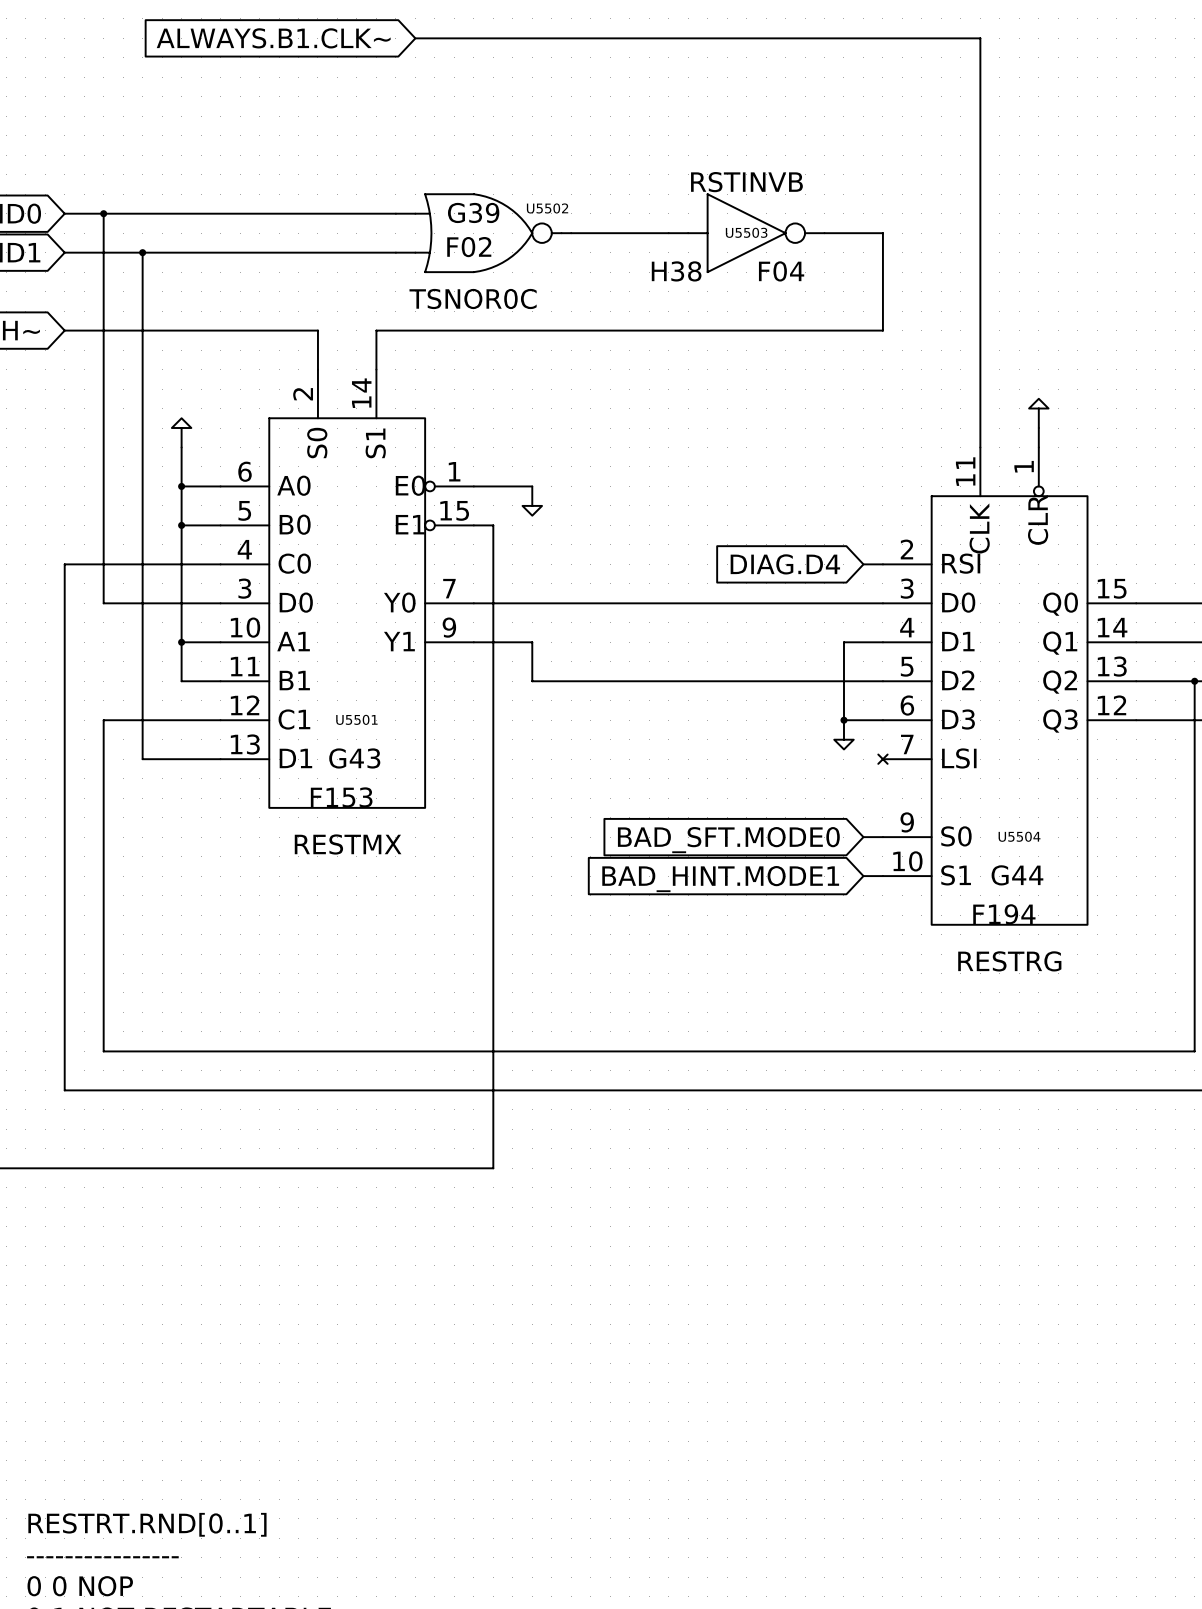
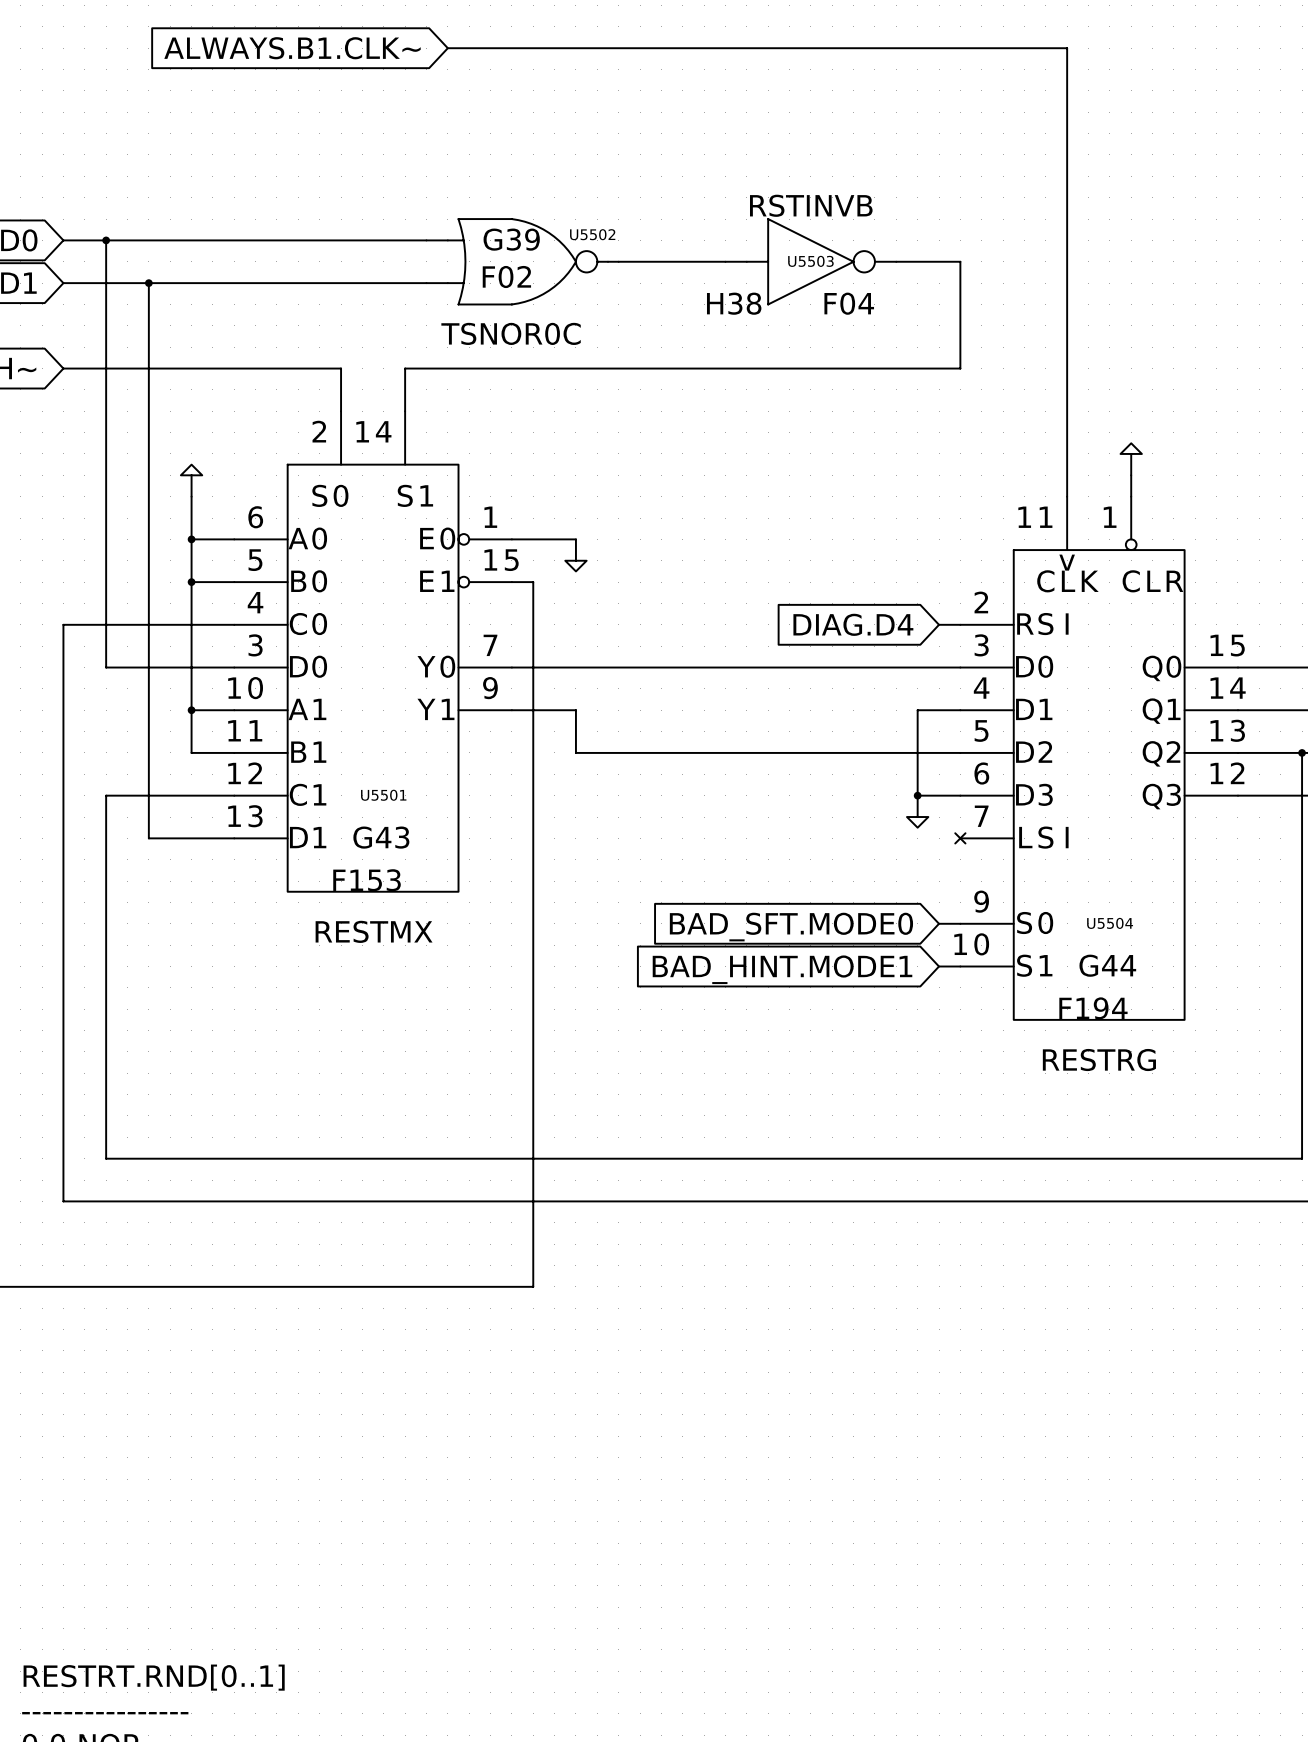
U5501 symbol: [220, 369, 474, 808] -> [234, 411, 512, 892]
U5504 symbol: [882, 447, 1137, 925] -> [960, 496, 1238, 1020]

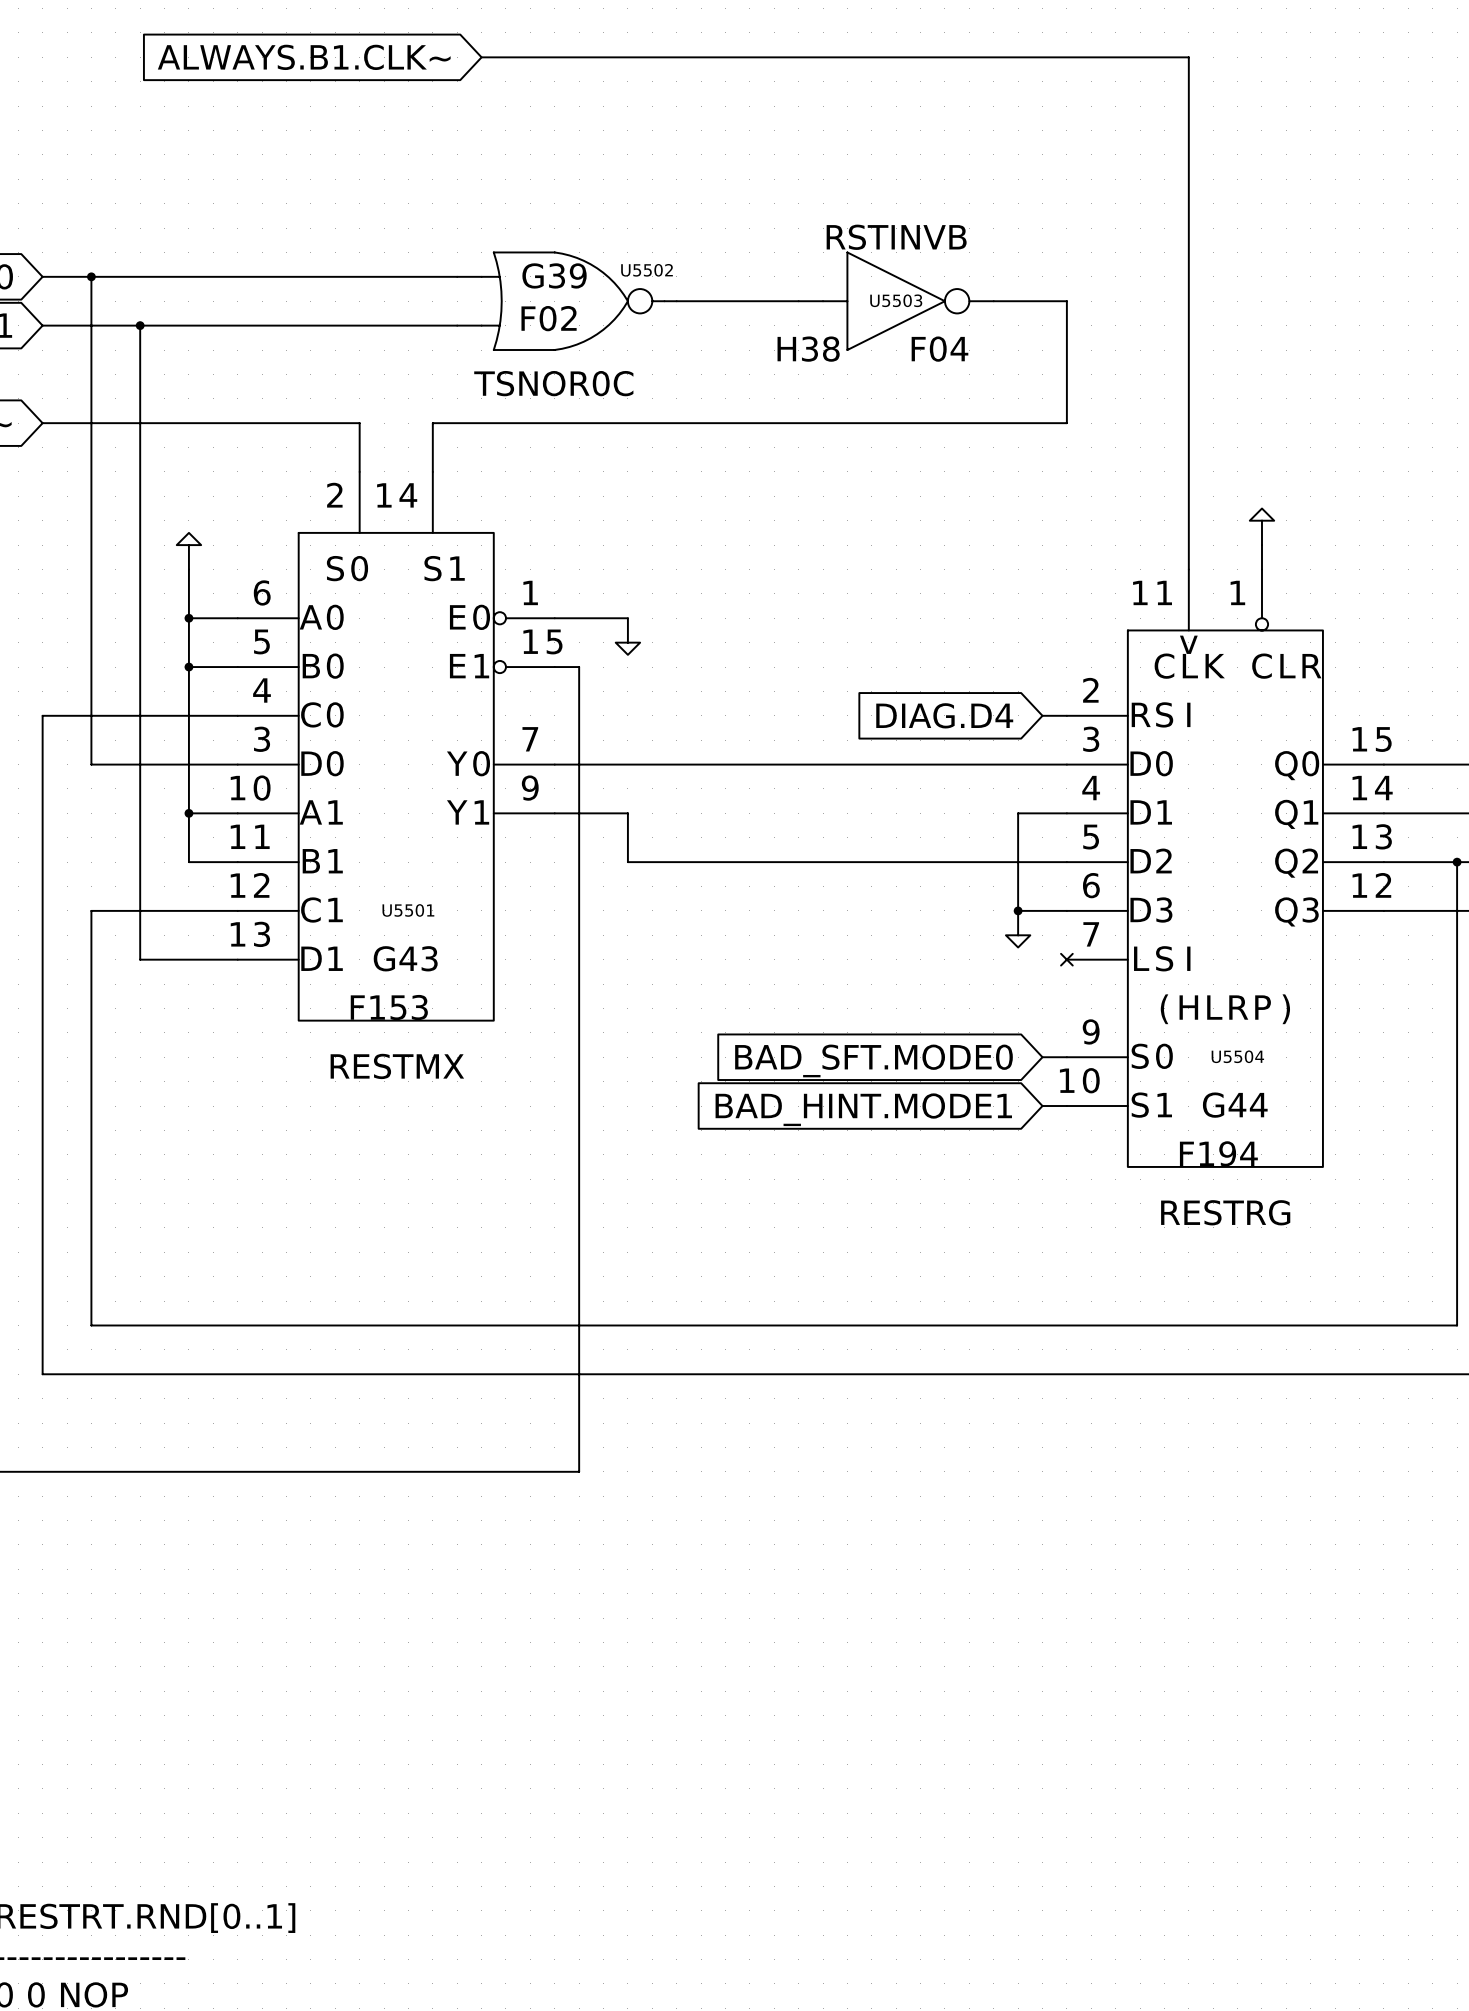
U5504 text: none -> H (1188, 1007)
U5504 text: none -> L (1214, 1007)
U5504 text: none -> R (1238, 1007)
U5504 text: none -> P (1263, 1007)
U5504 text: none -> ( (1164, 1009)
U5504 text: none -> ) (1286, 1009)

